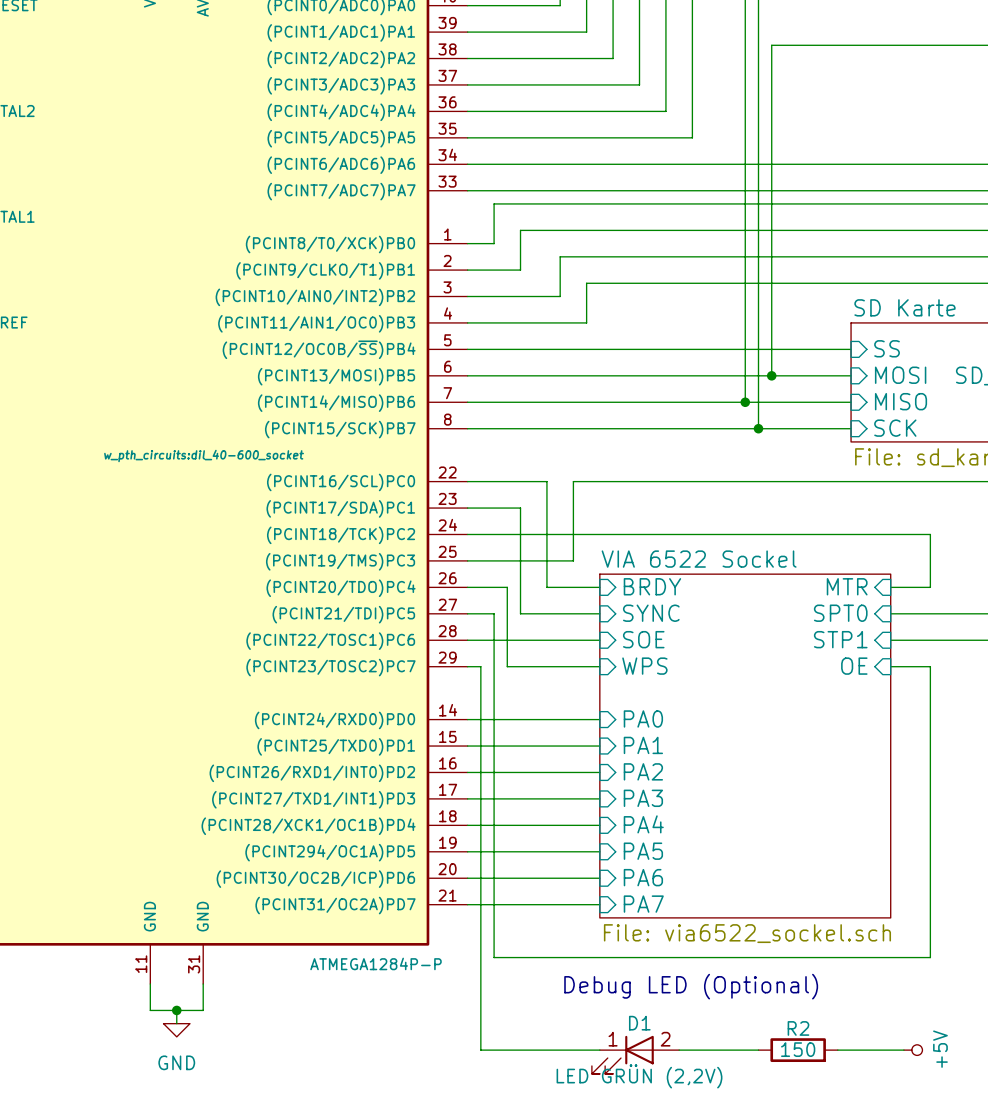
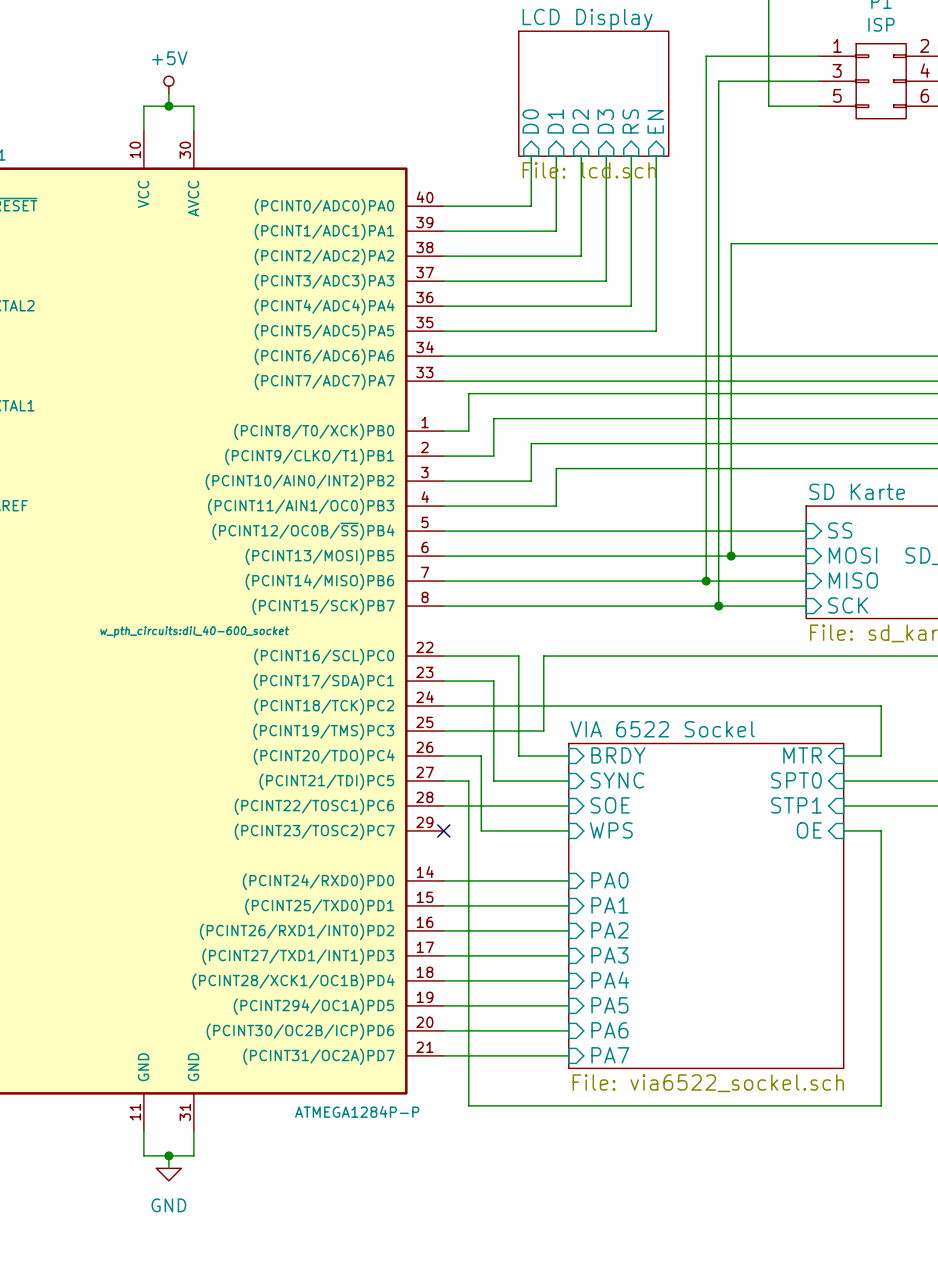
wire: (467, 666) (480, 666) (480, 1050) (599, 1050) -> none
no-connect mark: none -> (443, 830)
text: Debug LED (Optional) (691, 986) -> none
wire: (679, 1050) (758, 1050) -> none
R2: 150 (798, 1050) -> none
wire: (837, 1050) (903, 1050) -> none
power symbol: +5V (913, 1050) -> none
D1: LED GRÜN (2,2V) (635, 1054) -> none

